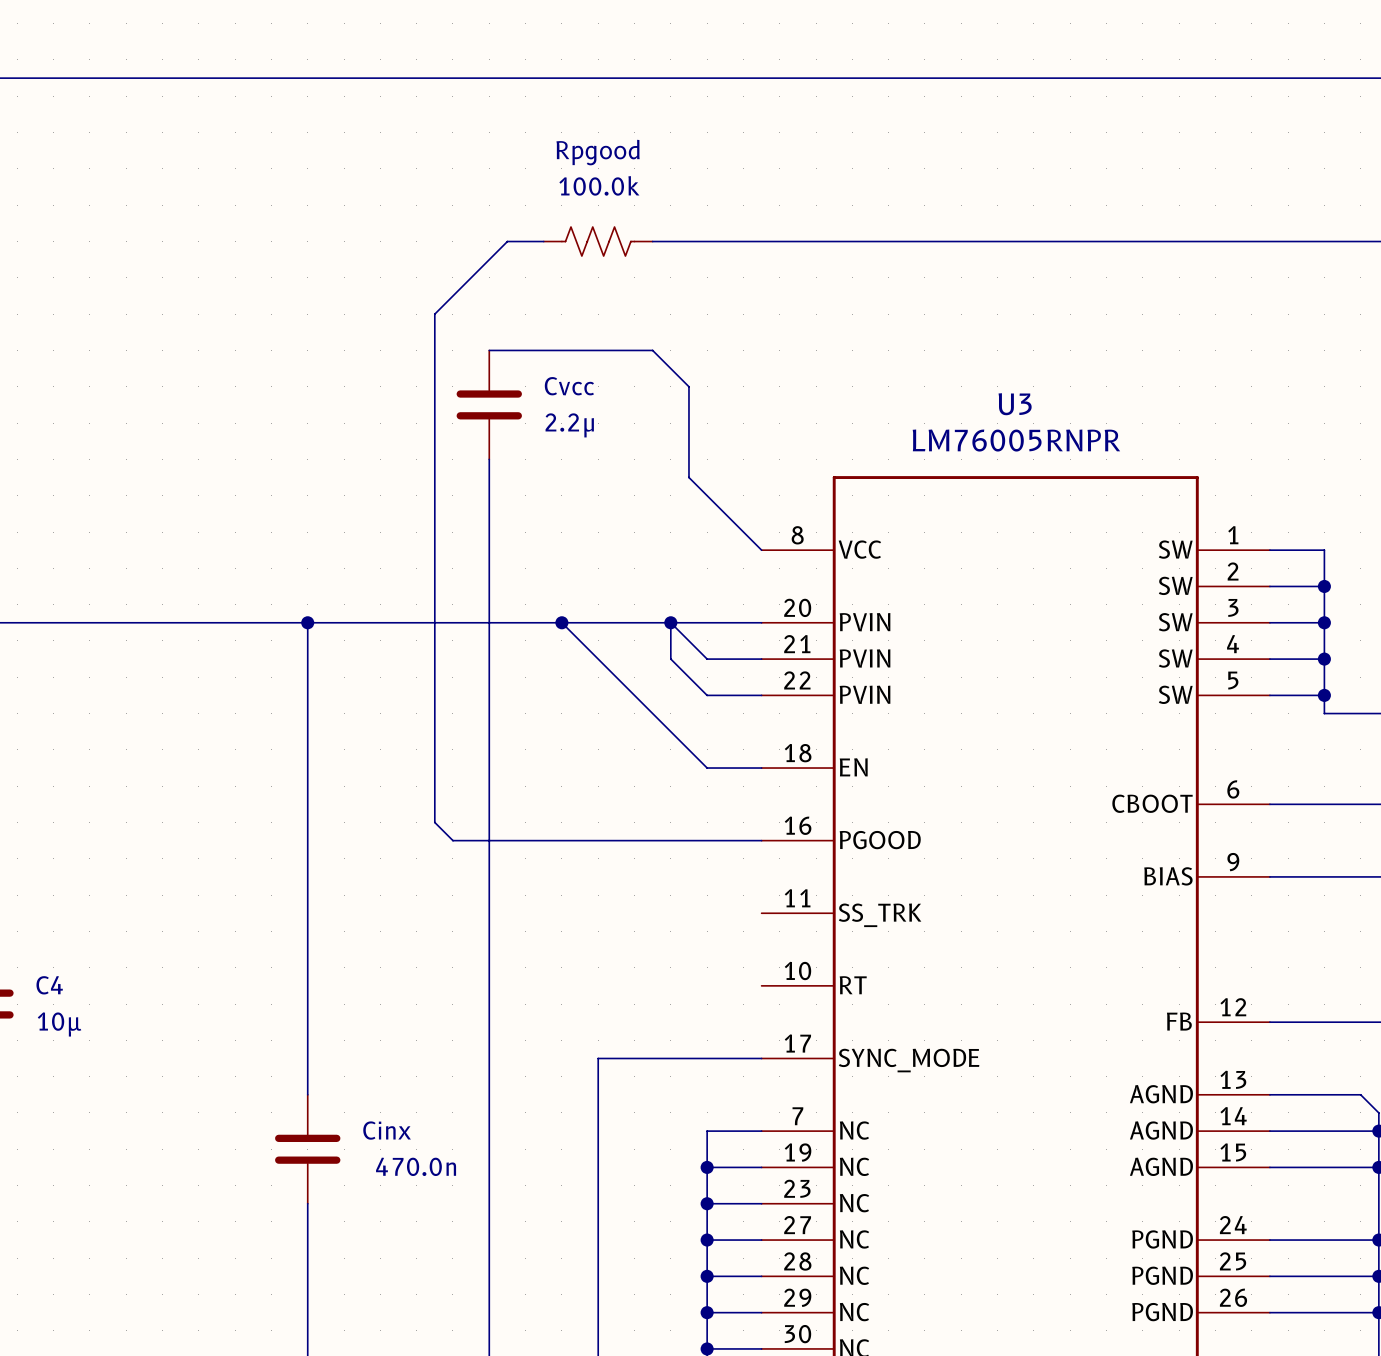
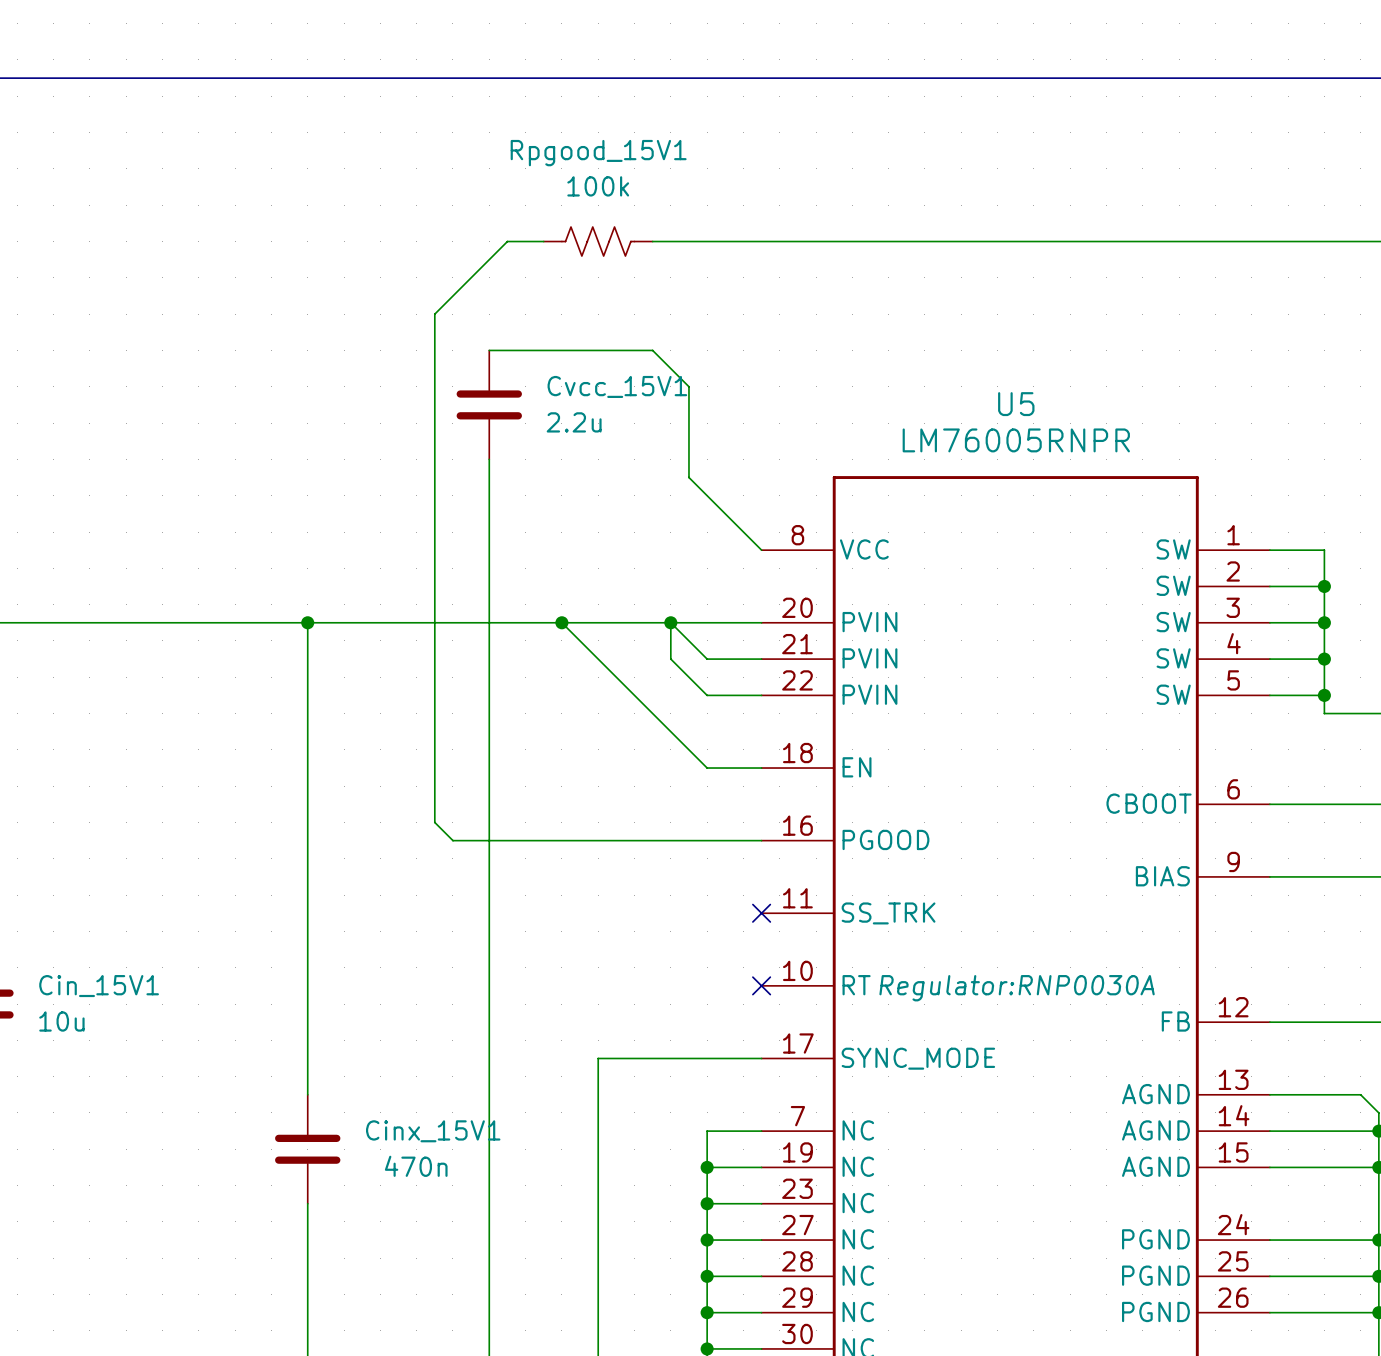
Rpgood name: Rpgood (598, 152) -> Rpgood_15V1 (598, 153)
Rpgood value: 100.0k (599, 185) -> 100k (598, 186)
Cvcc name: Cvcc (569, 386) -> Cvcc_15V1 (617, 386)
U3 name: U3 (1015, 404) -> U5 (1016, 404)
Cvcc value: 2.2μ (569, 425) -> 2.2u (574, 422)
no-connect mark: none -> (761, 913)
C4 name: C4 (49, 985) -> Cin_15V1 (99, 986)
no-connect mark: none -> (761, 985)
U3 text: none -> Regulator:RNP0030A (1017, 988)
C4 value: 10µ (59, 1024) -> 10u (61, 1021)
Cinx name: Cinx (387, 1130) -> Cinx_15V1 (433, 1131)
Cinx value: 470.0n (416, 1166) -> 470n (416, 1166)

